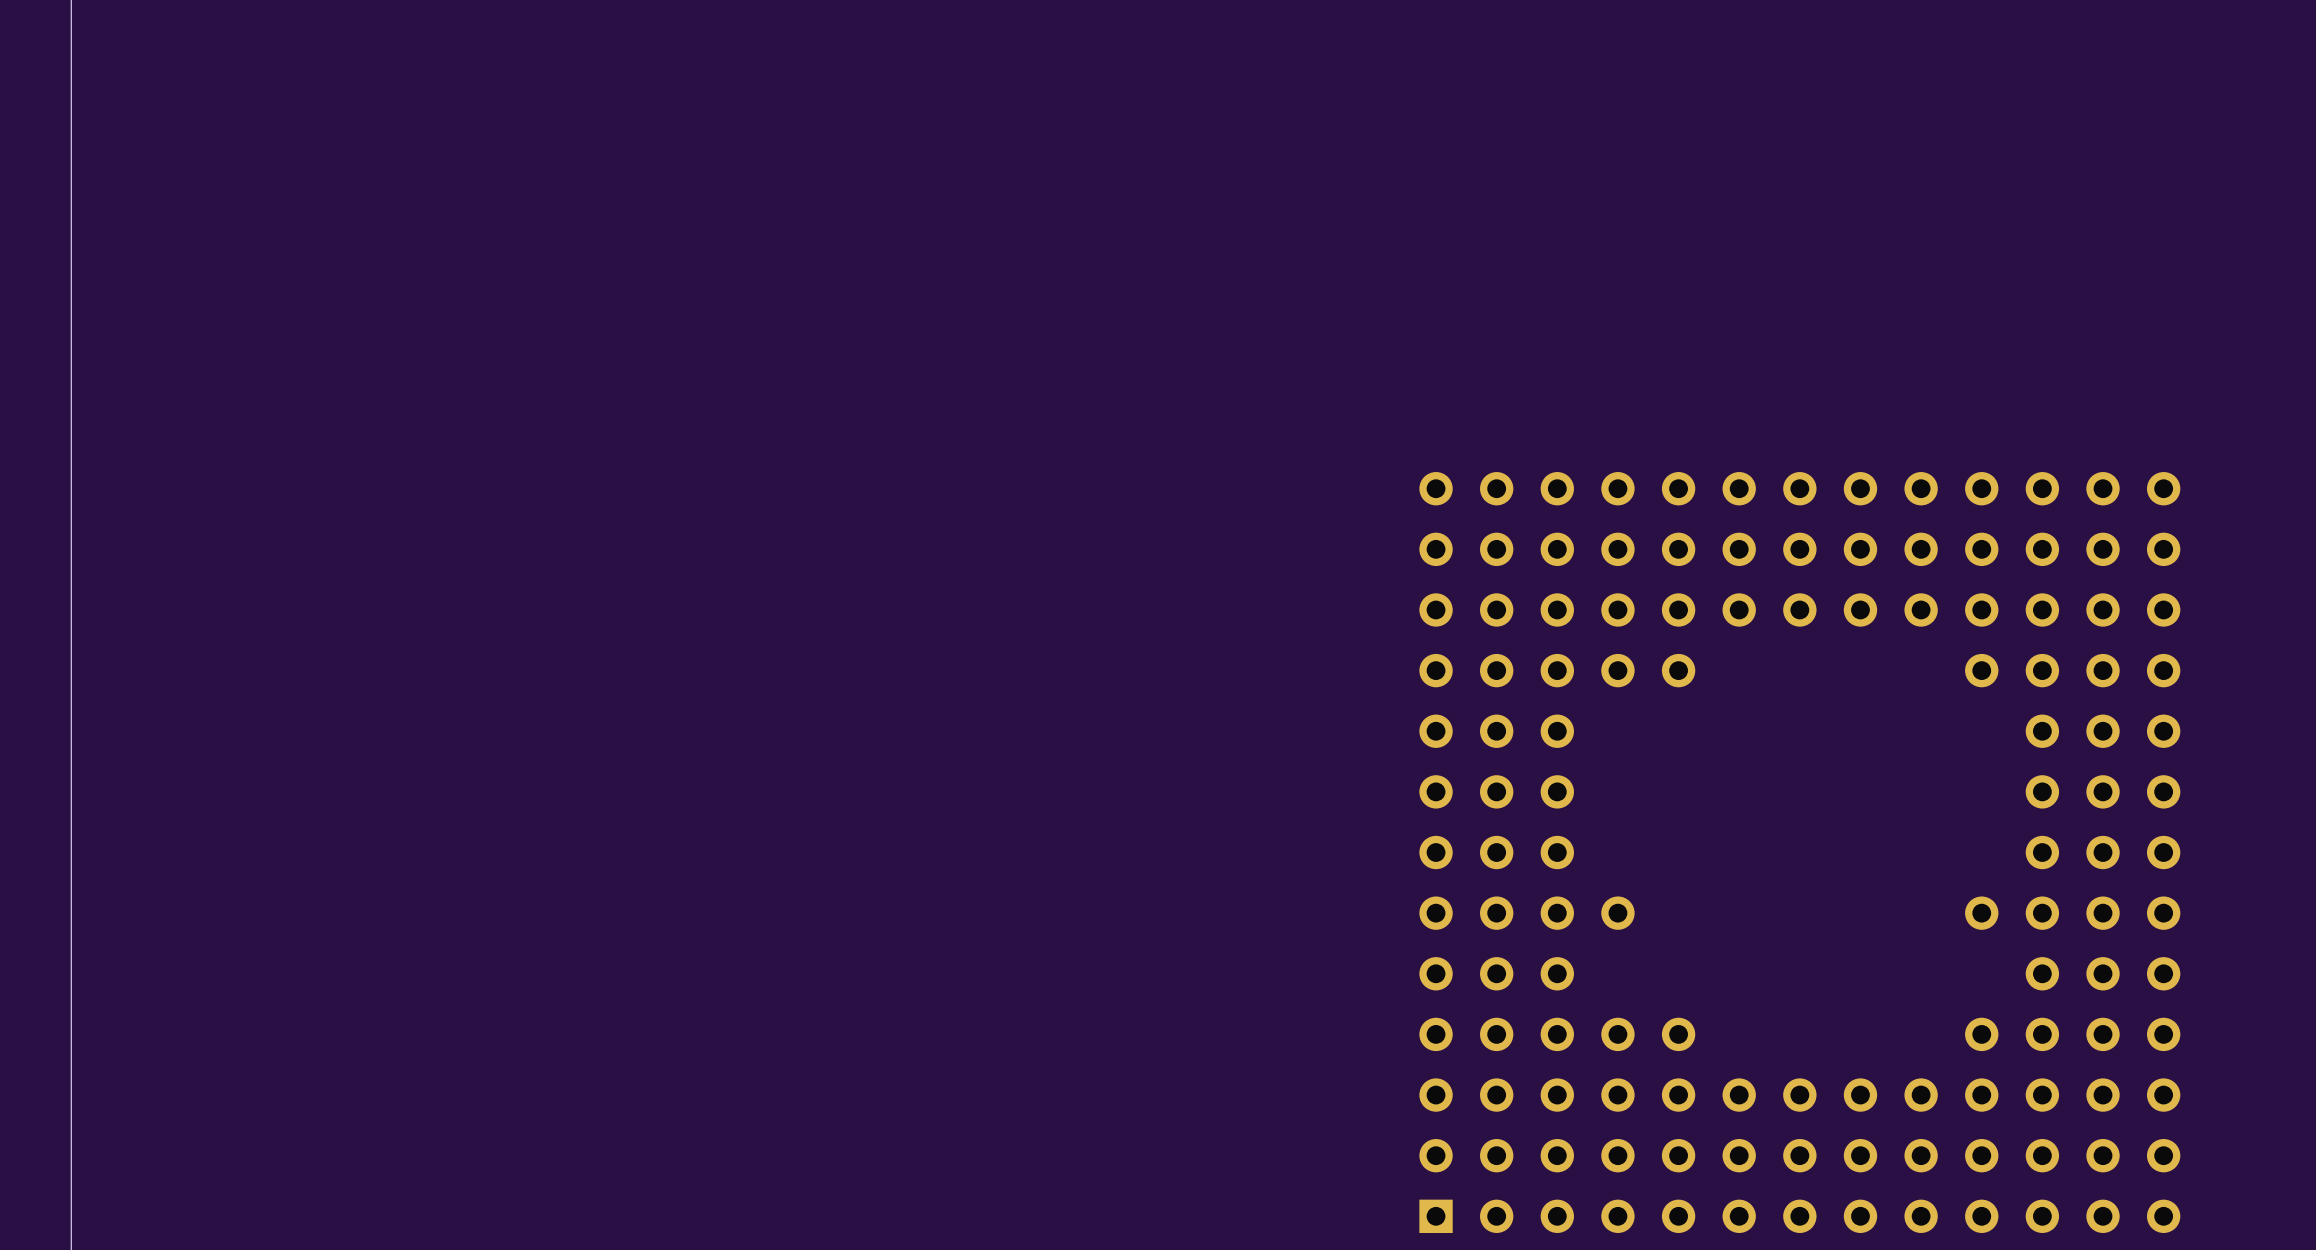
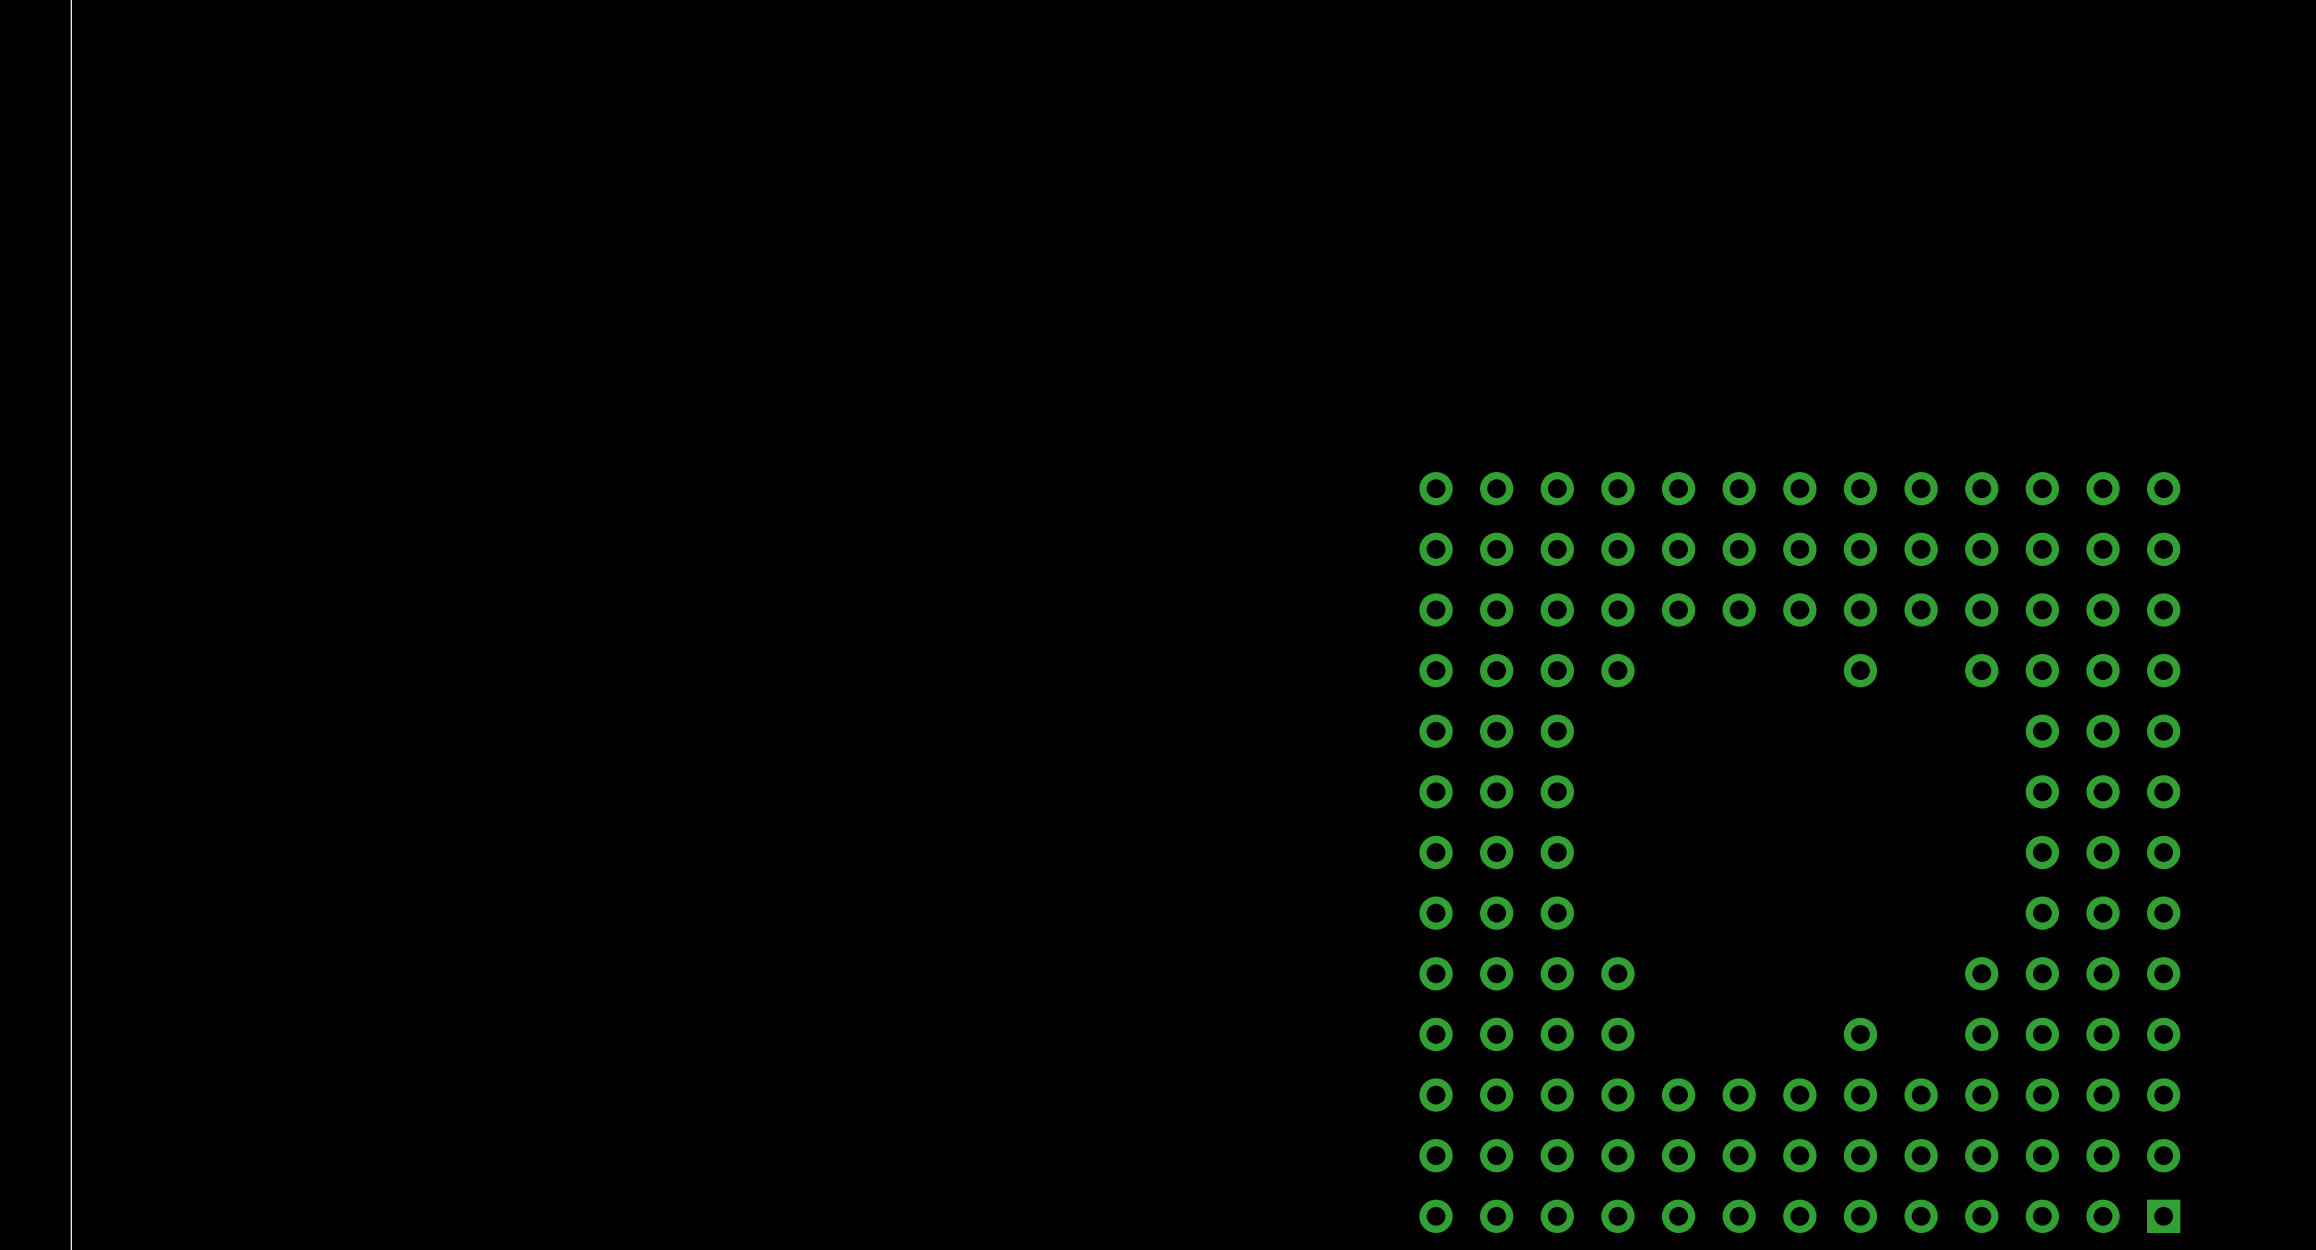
part rotation: 0° (1799, 852) -> 90° counterclockwise (1799, 852)

